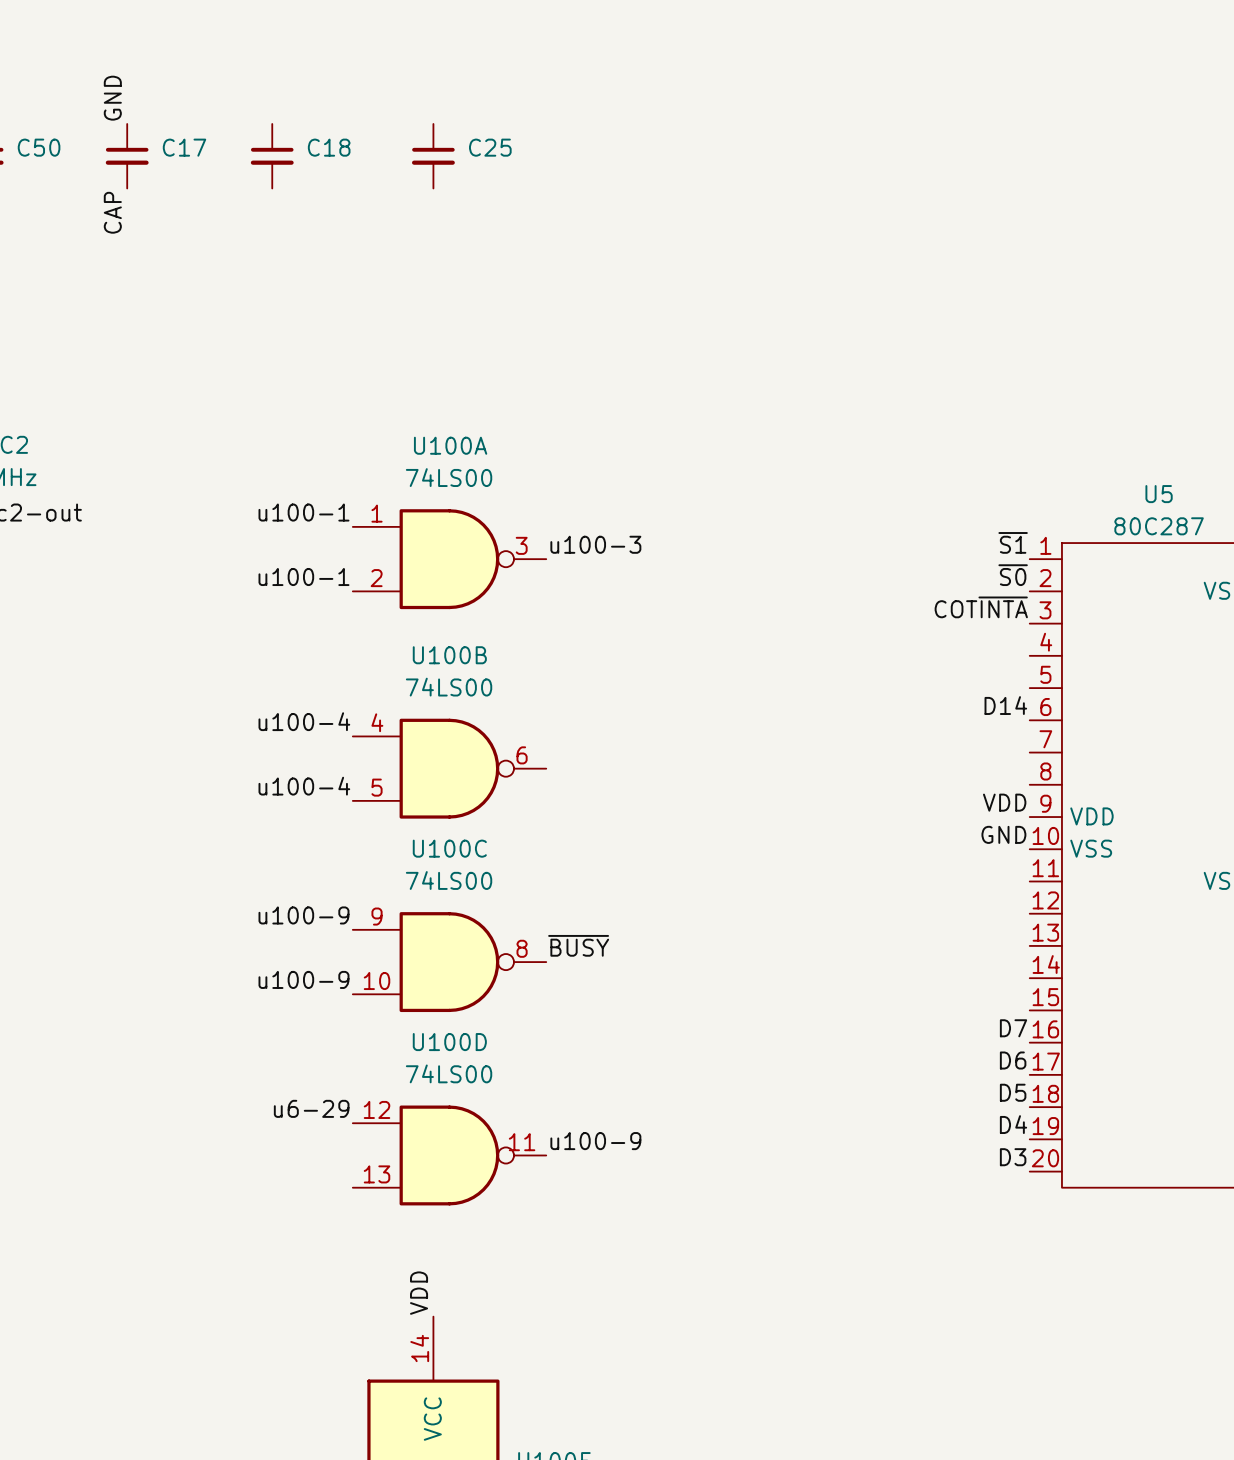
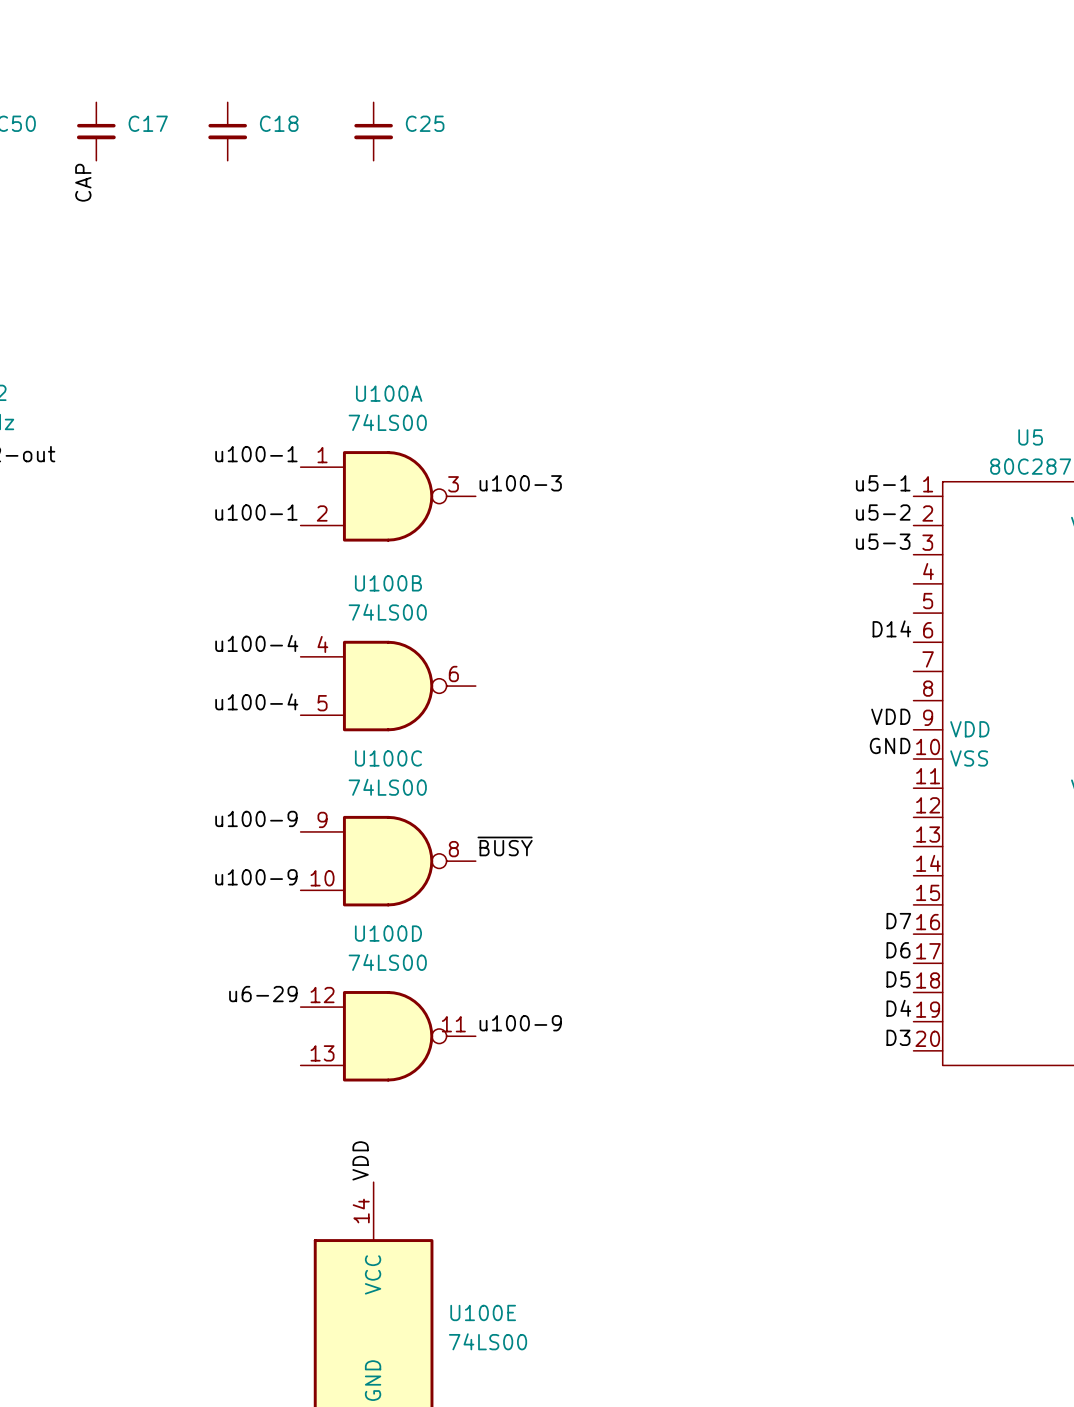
label: GND (112, 98) -> none
label: ~{S1} (1013, 542) -> u5-1 (883, 483)
label: ~{S0} (1013, 575) -> u5-2 (883, 512)
label: COT~{INTA} (981, 607) -> u5-3 (883, 541)

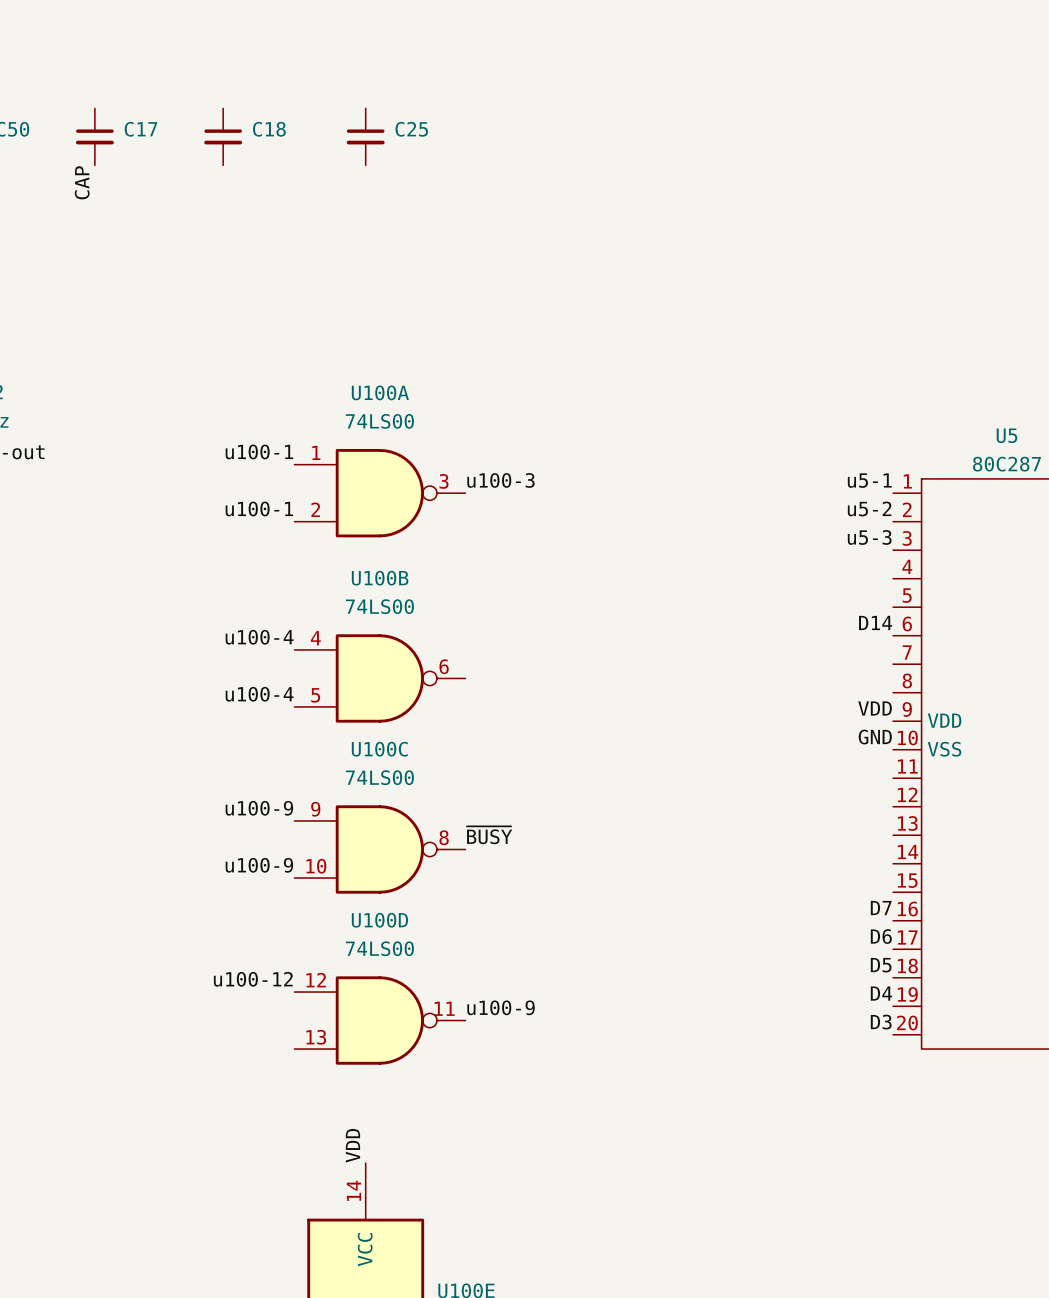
label: u6-29 (263, 994) -> u100-12 (253, 979)

